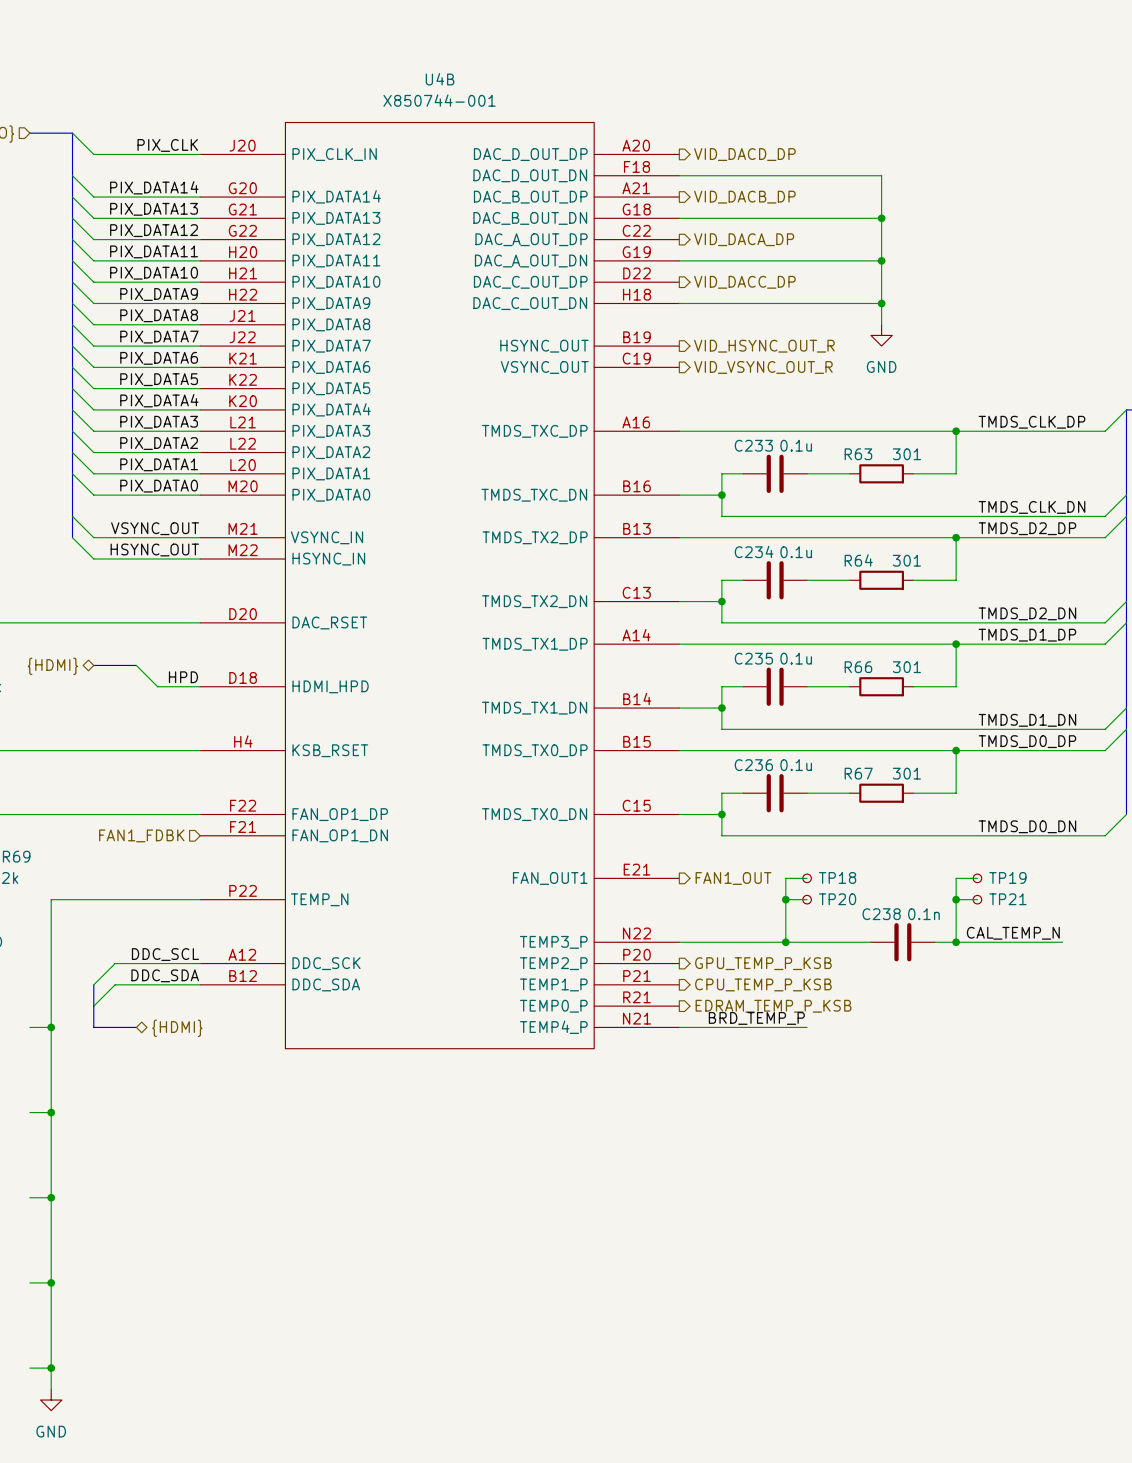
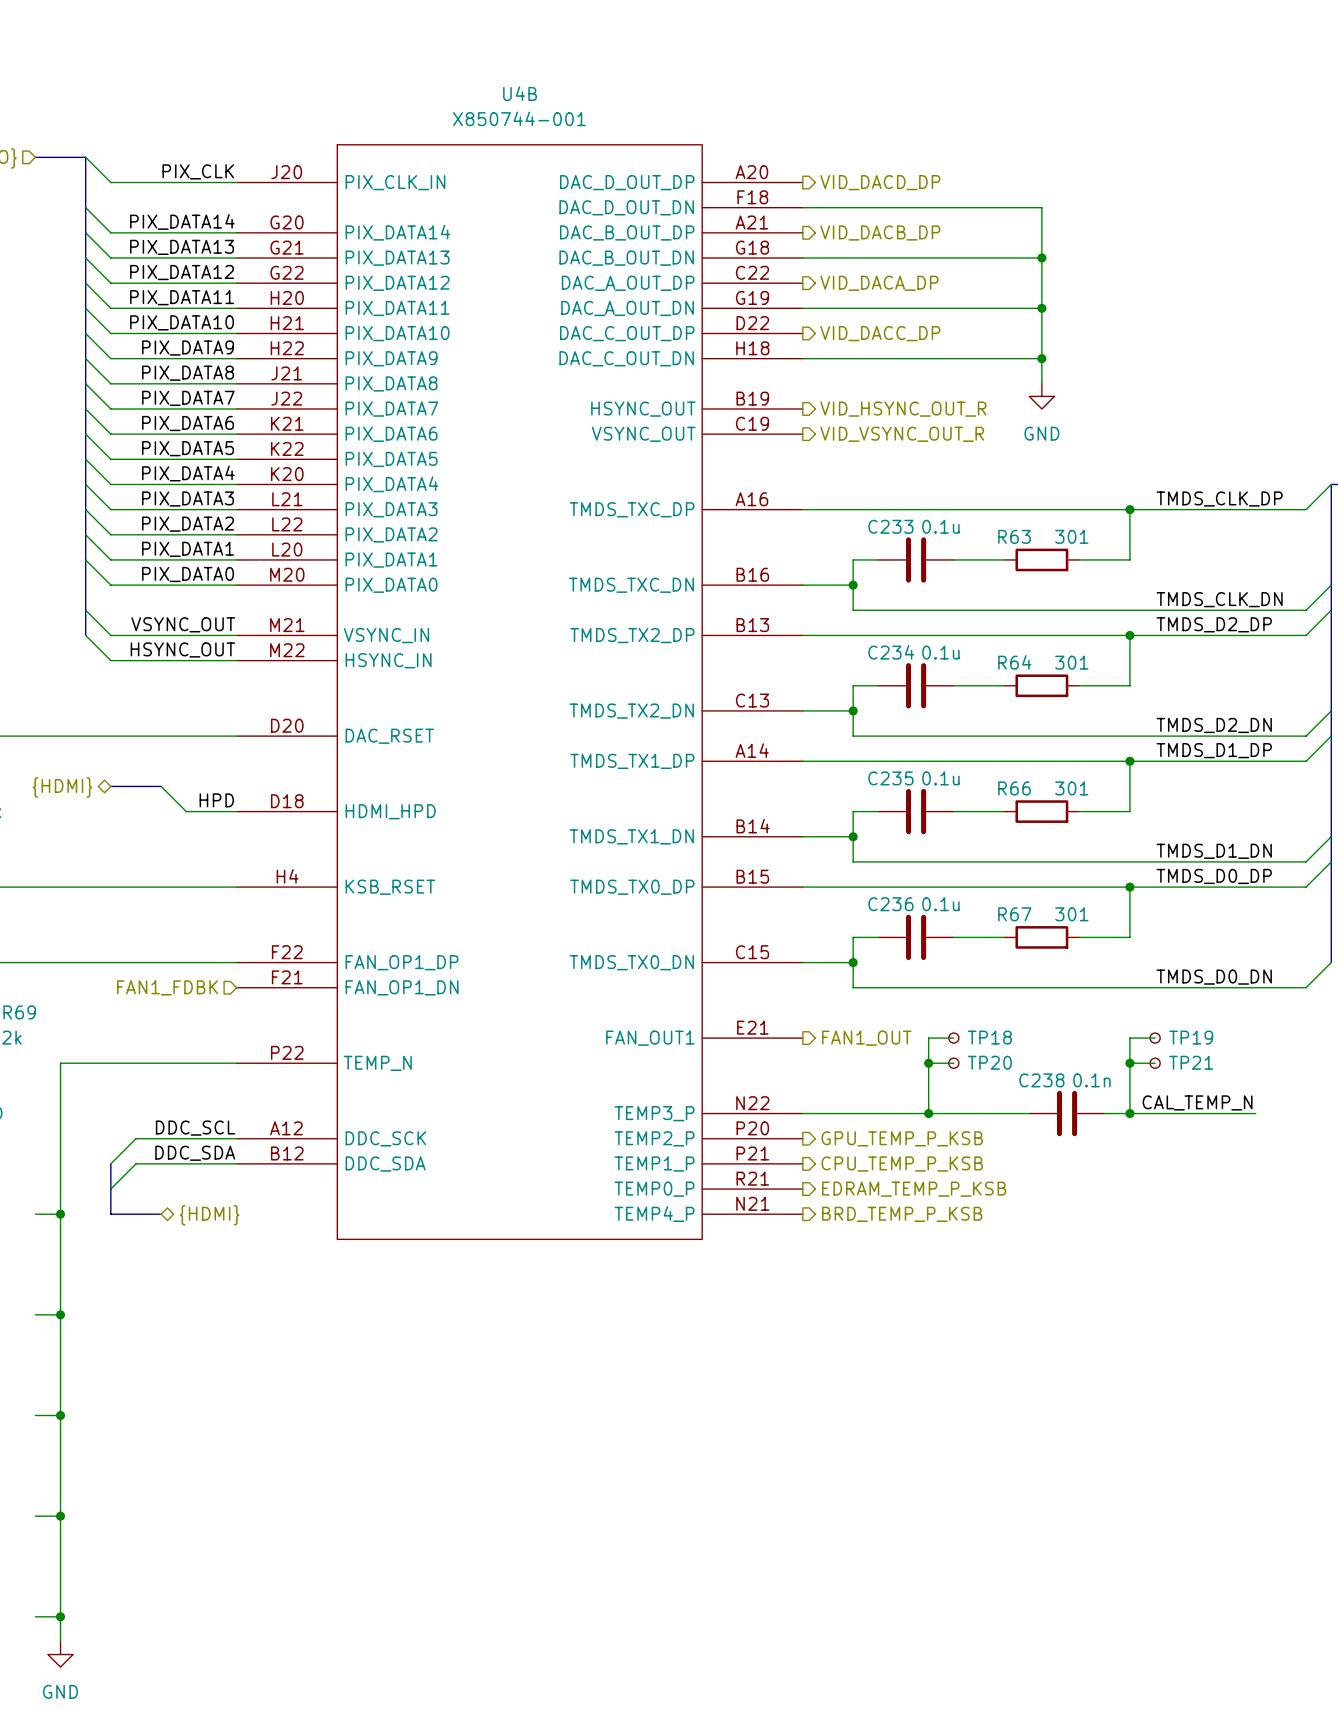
label: BRD_TEMP_P (756, 1018) -> none
wire: (679, 1027) (807, 1027) -> none
hierarchical label: none -> BRD_TEMP_P_KSB (902, 1214)

